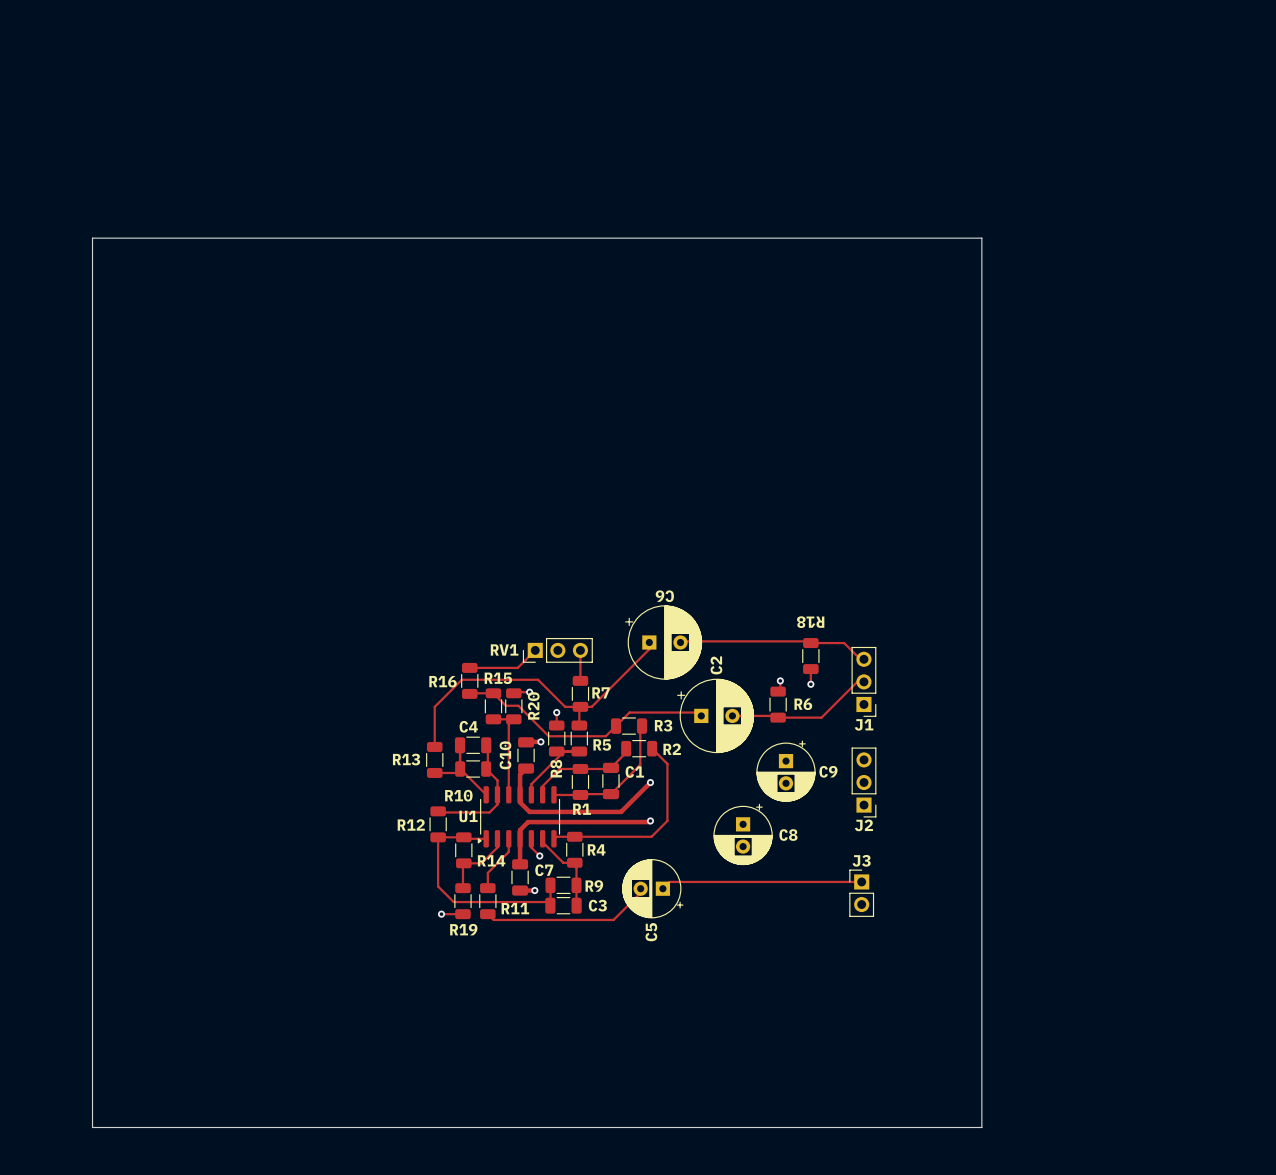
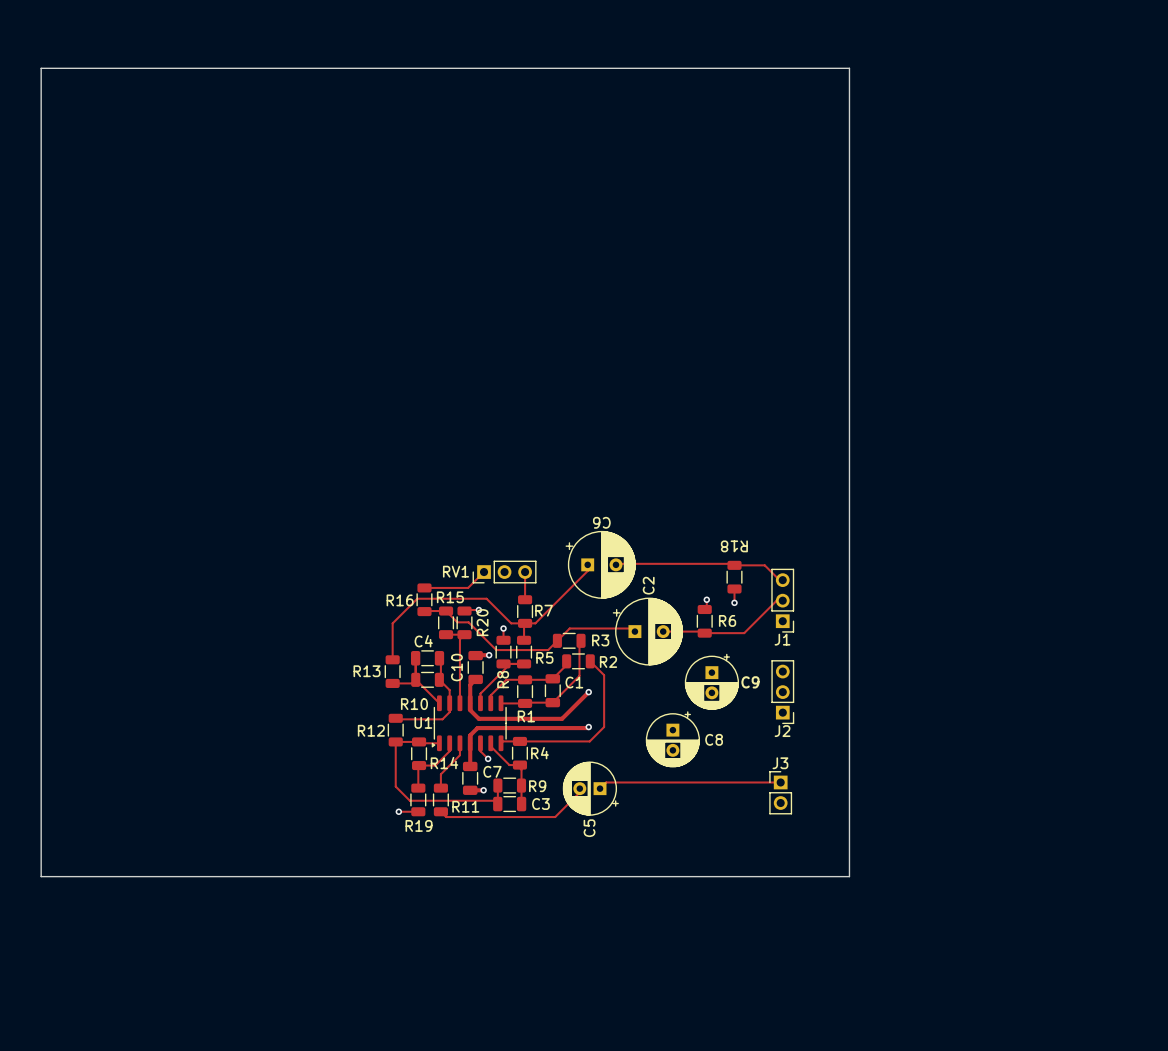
board edge: (92, 238) (981, 238) (981, 1127) (92, 1127) (92, 238) -> (41, 68) (41, 876) (849, 876) (849, 68) (41, 68)

